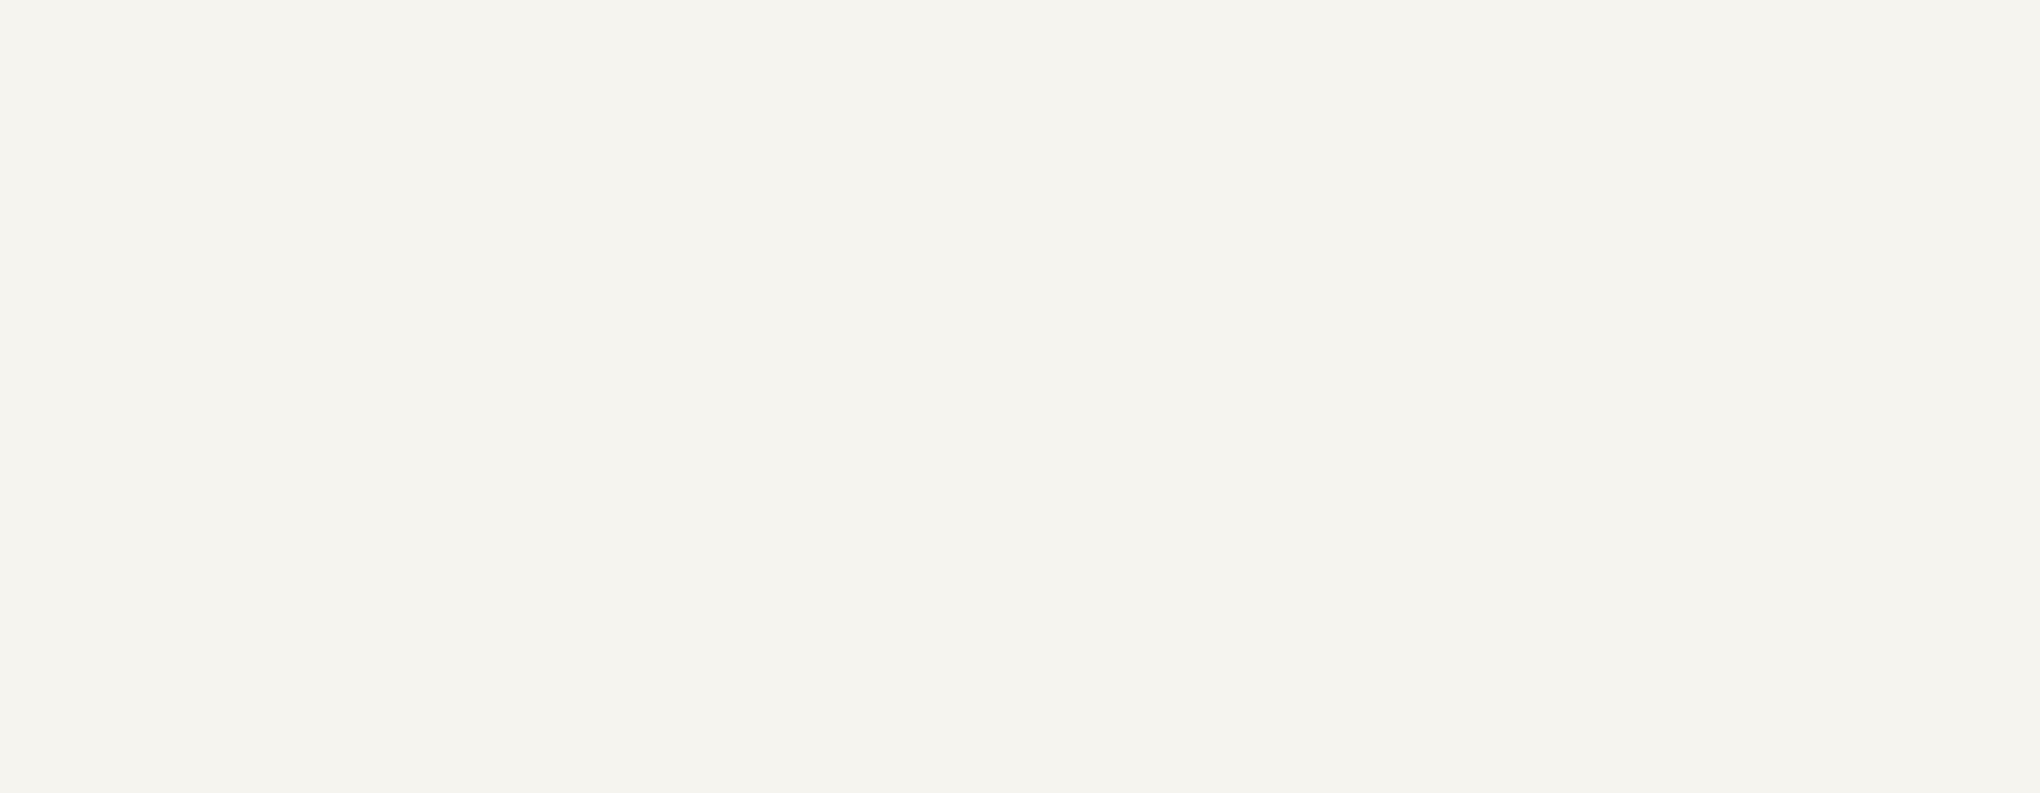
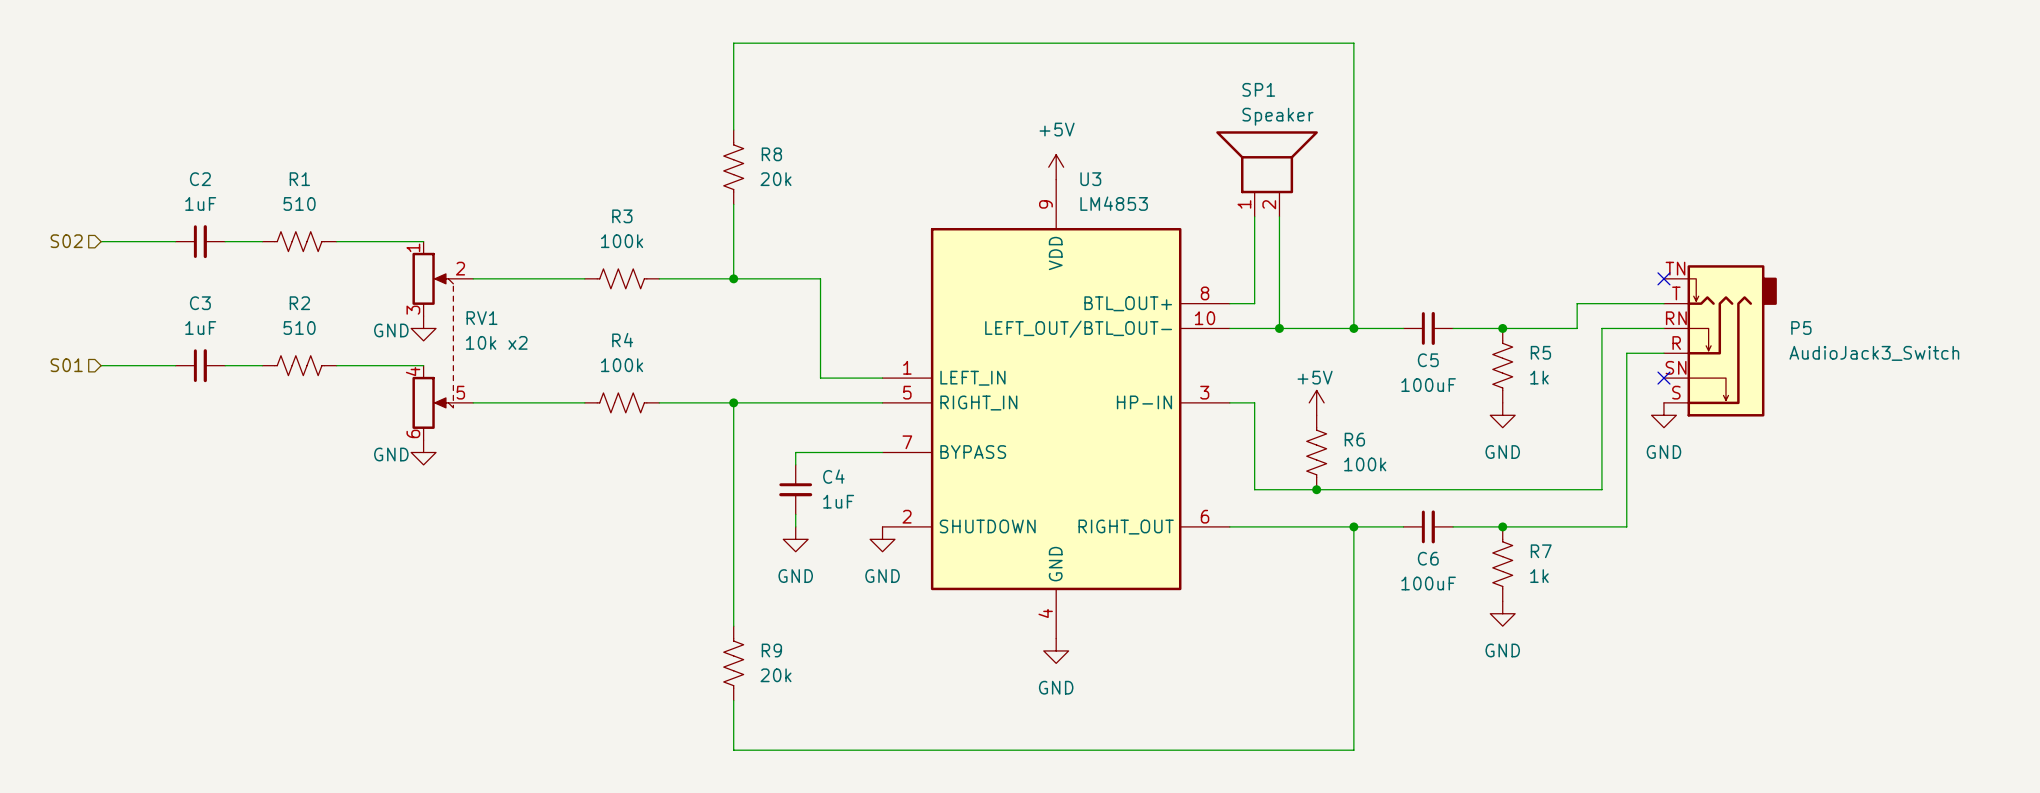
wire: none -> (733, 130) (733, 43) (1353, 43) (1353, 328)
R8: none -> 20k (733, 167)
power symbol: none -> +5V (1056, 167)
SP1: none -> Speaker (1267, 174)
wire: none -> (733, 204) (733, 278)
wire: none -> (1254, 216) (1254, 303) (1229, 303)
wire: none -> (1279, 216) (1279, 328)
hierarchical label: none -> S02 (66, 241)
wire: none -> (101, 241) (175, 241)
C2: none -> 1uF (200, 241)
wire: none -> (225, 241) (262, 241)
R1: none -> 510 (299, 241)
wire: none -> (336, 241) (423, 241)
wire: none -> (473, 278) (584, 278)
R3: none -> 100k (622, 278)
wire: none -> (659, 278) (820, 278) (820, 378) (882, 378)
junction: none -> (733, 278)
no-connect mark: none -> (1663, 278)
wire: none -> (1663, 303) (1577, 303) (1577, 328) (1453, 328)
power symbol: none -> GND (423, 328)
wire: none -> (1229, 328) (1403, 328)
junction: none -> (1279, 328)
junction: none -> (1353, 328)
C5: none -> 100uF (1428, 328)
junction: none -> (1502, 328)
wire: none -> (1663, 328) (1601, 328) (1601, 489) (1254, 489) (1254, 402) (1229, 402)
RV1: none -> 10k x2 (442, 340)
P5: none -> AudioJack3_Switch (1720, 340)
wire: none -> (1663, 353) (1626, 353) (1626, 526) (1453, 526)
hierarchical label: none -> S01 (66, 365)
wire: none -> (101, 365) (175, 365)
C3: none -> 1uF (200, 365)
wire: none -> (225, 365) (262, 365)
R2: none -> 510 (299, 365)
wire: none -> (336, 365) (423, 365)
R5: none -> 1k (1502, 365)
no-connect mark: none -> (1663, 378)
wire: none -> (473, 402) (584, 402)
R4: none -> 100k (622, 402)
wire: none -> (659, 402) (882, 402)
wire: none -> (733, 402) (733, 626)
junction: none -> (733, 402)
power symbol: none -> +5V (1316, 402)
U3: none -> LM4853 (1056, 409)
power symbol: none -> GND (1502, 415)
power symbol: none -> GND (1663, 415)
power symbol: none -> GND (423, 452)
wire: none -> (882, 452) (795, 452) (795, 464)
R6: none -> 100k (1316, 452)
C4: none -> 1uF (795, 489)
junction: none -> (1316, 489)
wire: none -> (795, 514) (795, 526)
wire: none -> (1229, 526) (1403, 526)
wire: none -> (1353, 526) (1353, 750) (733, 750) (733, 700)
junction: none -> (1353, 526)
C6: none -> 100uF (1428, 526)
junction: none -> (1502, 526)
power symbol: none -> GND (795, 539)
power symbol: none -> GND (882, 539)
R7: none -> 1k (1502, 564)
power symbol: none -> GND (1502, 613)
power symbol: none -> GND (1056, 650)
R9: none -> 20k (733, 663)

